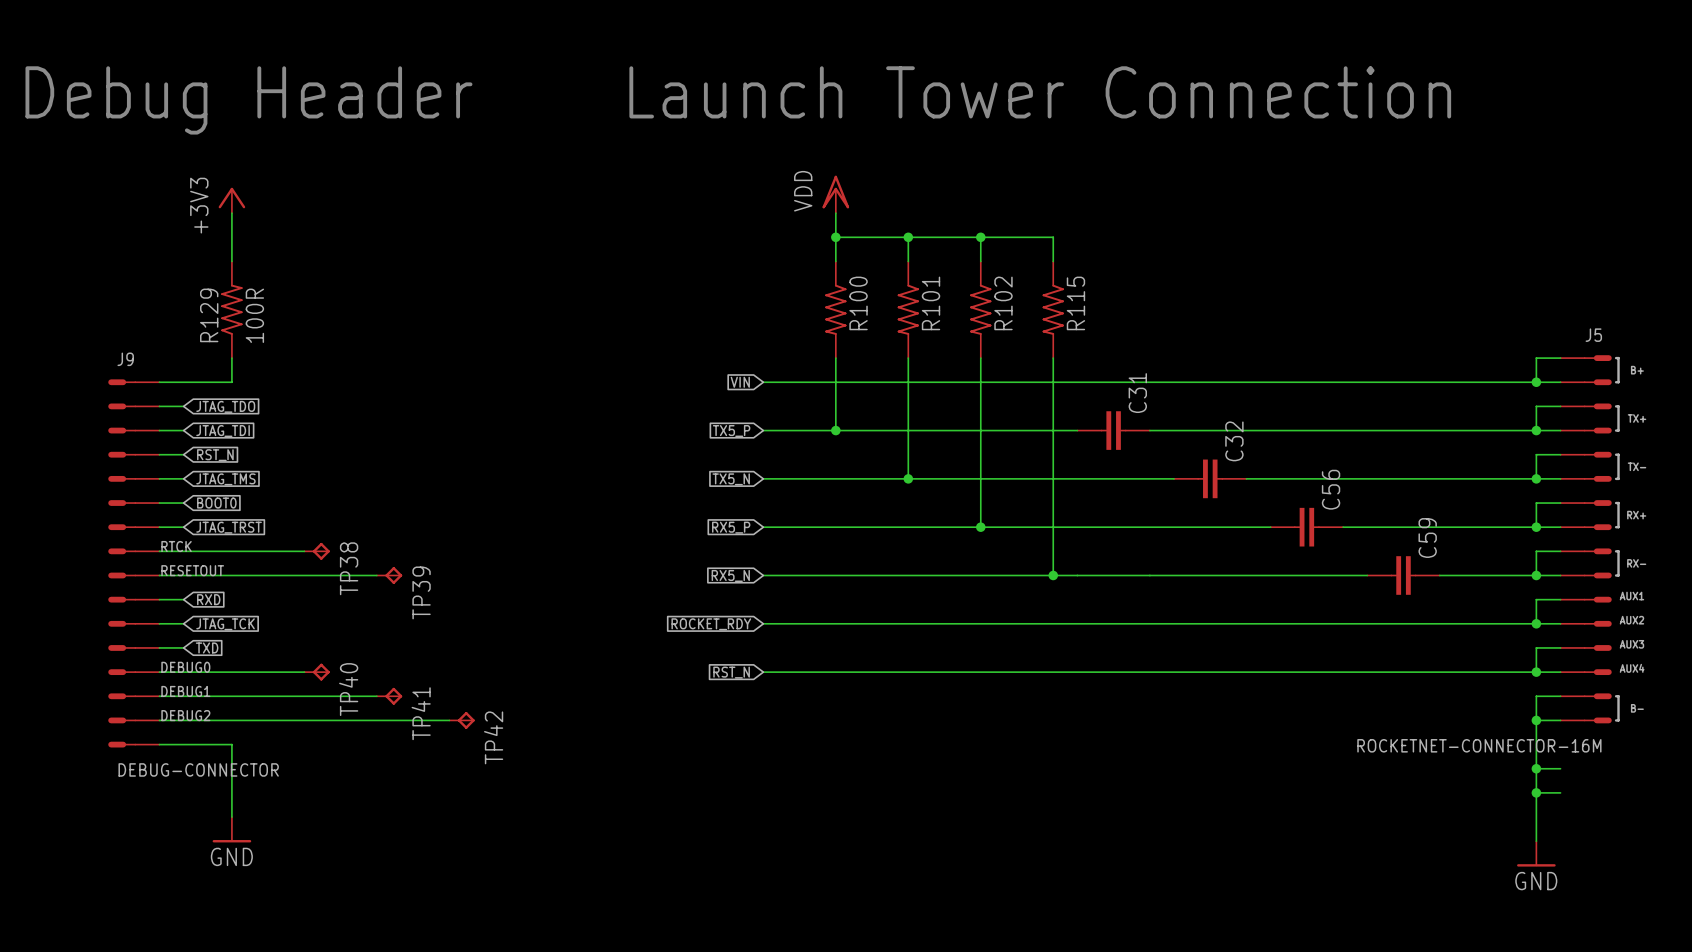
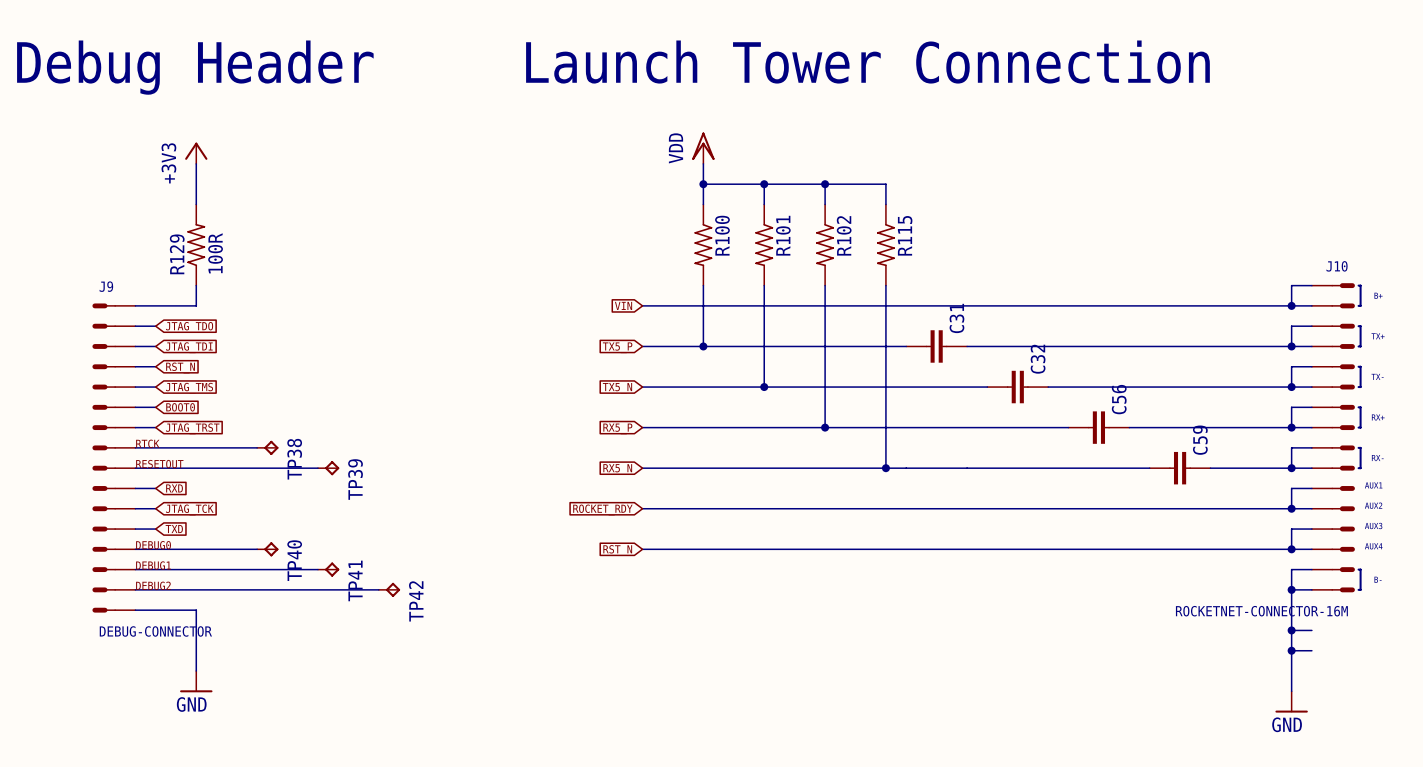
J5 name: J5 (1593, 335) -> J10 (1337, 266)

